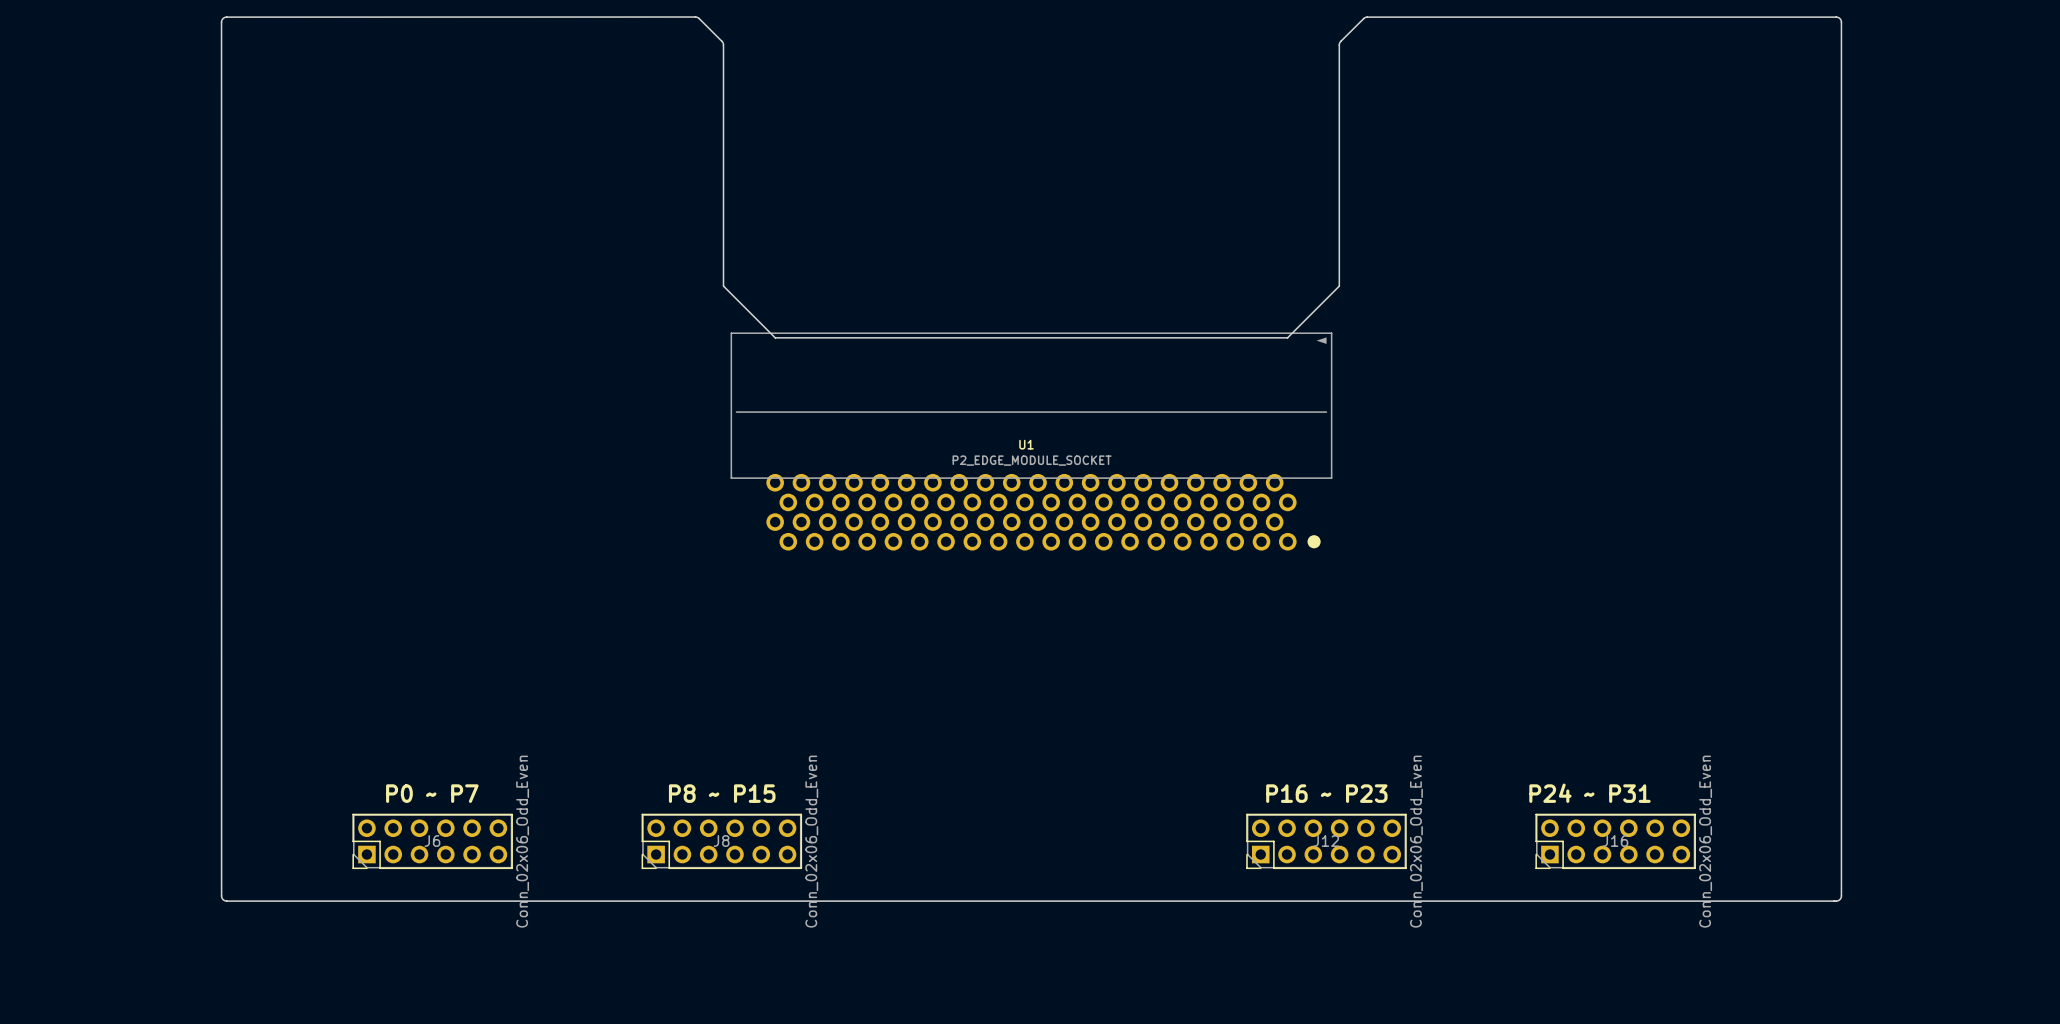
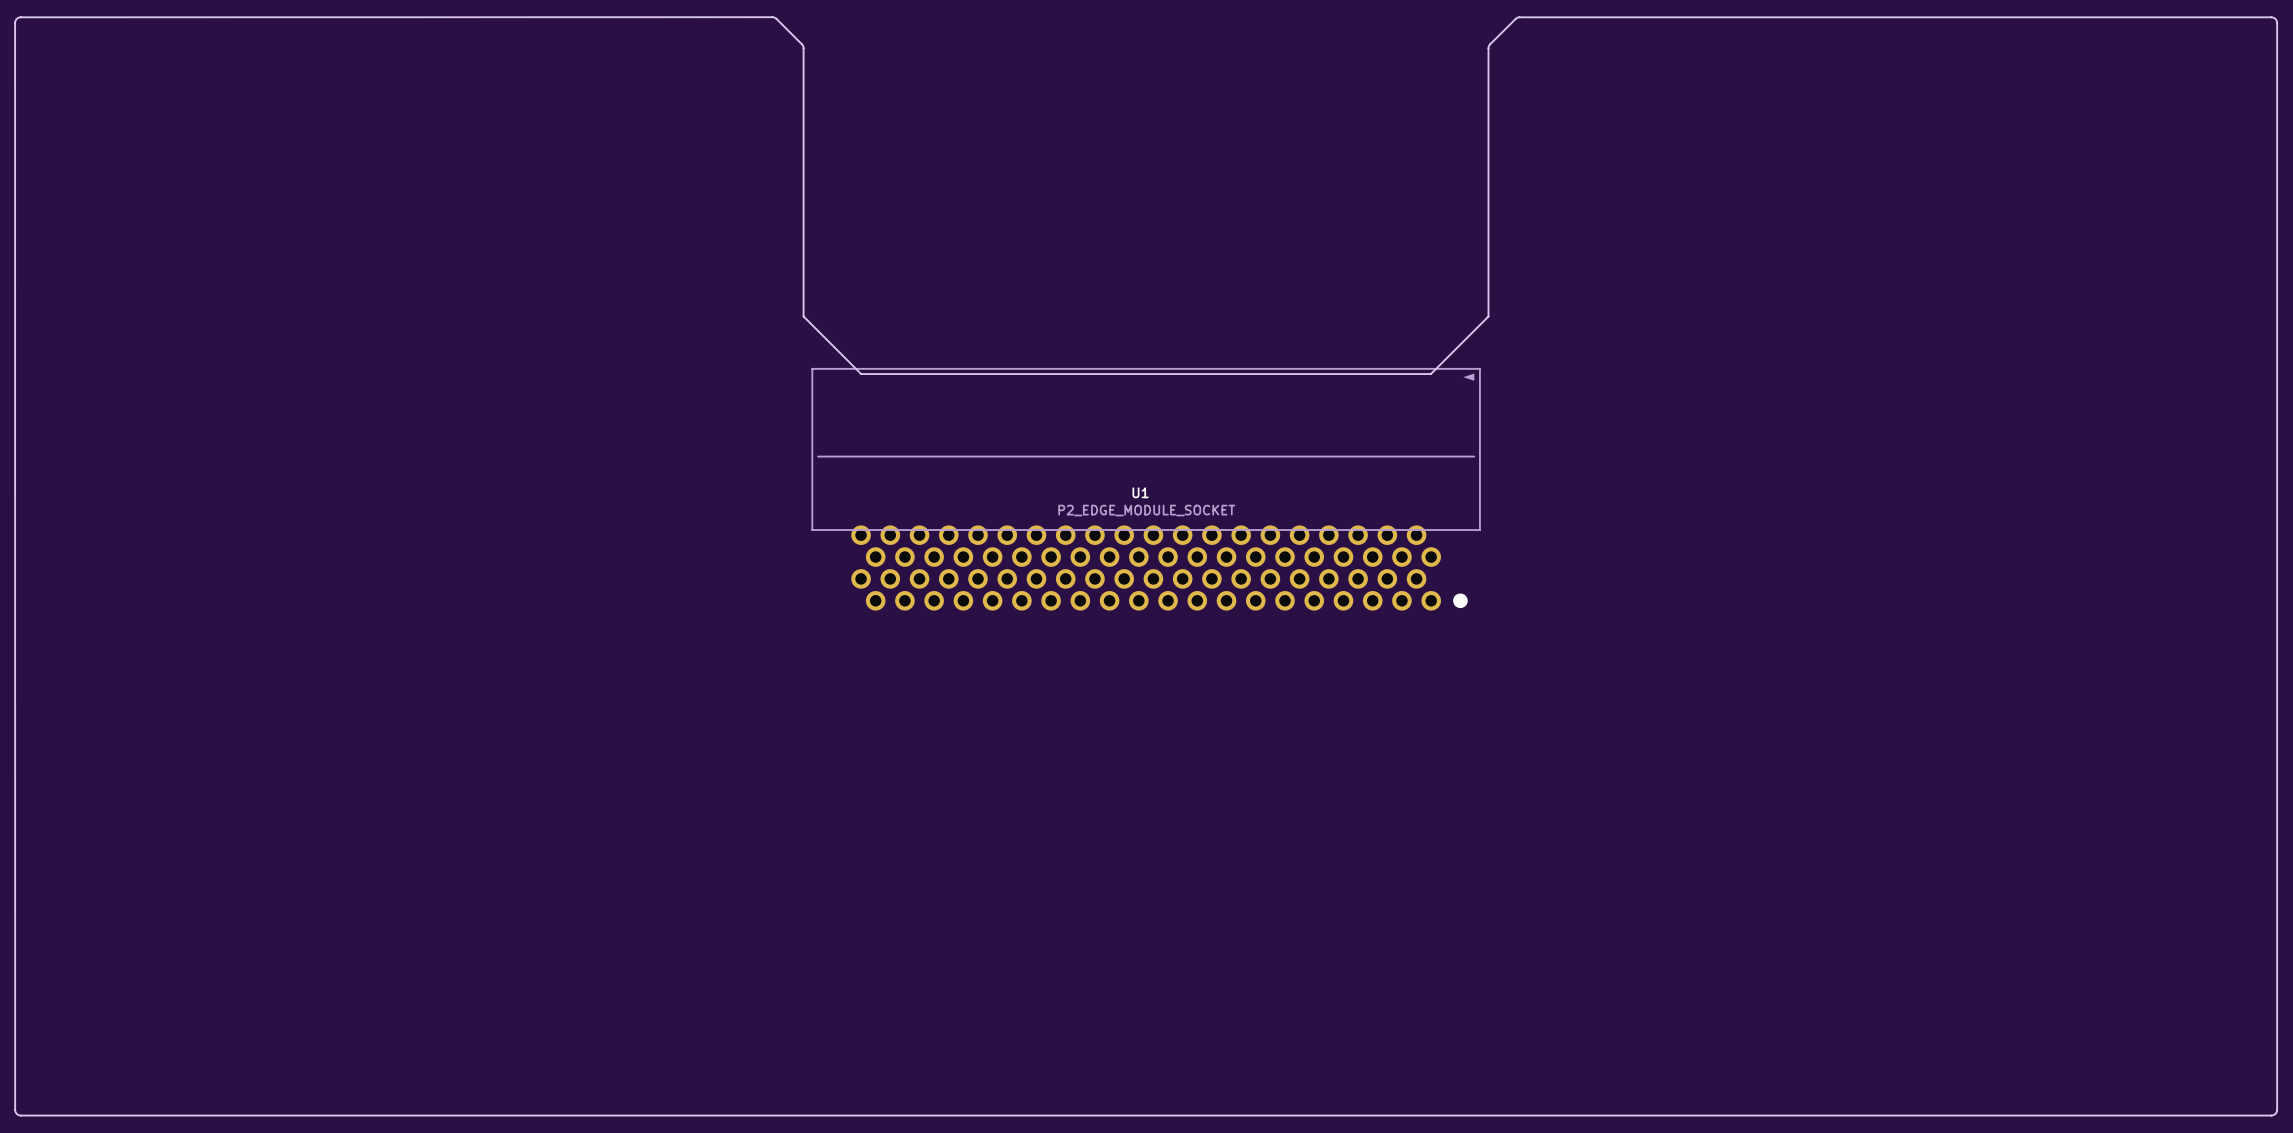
board edge: (695, 17) (226, 17) (222, 19) (221, 895) (224, 900) (1838, 900) (1841, 895) (1841, 22) (1839, 18) (1836, 17) -> (772, 17) (20, 17) (16, 19) (15, 1109) (17, 1114) (2274, 1114) (2277, 1109) (2276, 21) (2271, 17) (2041, 17)
text: P0 ~ P7 (432, 793) -> none
text: P8 ~ P15 (722, 793) -> none
text: P16 ~ P23 (1326, 793) -> none
text: P24 ~ P31 (1589, 793) -> none
J6: Conn_02x06_Odd_Even (432, 841) -> none
J8: Conn_02x06_Odd_Even (721, 841) -> none
J12: Conn_02x06_Odd_Even (1326, 841) -> none
J16: Conn_02x06_Odd_Even (1615, 841) -> none

